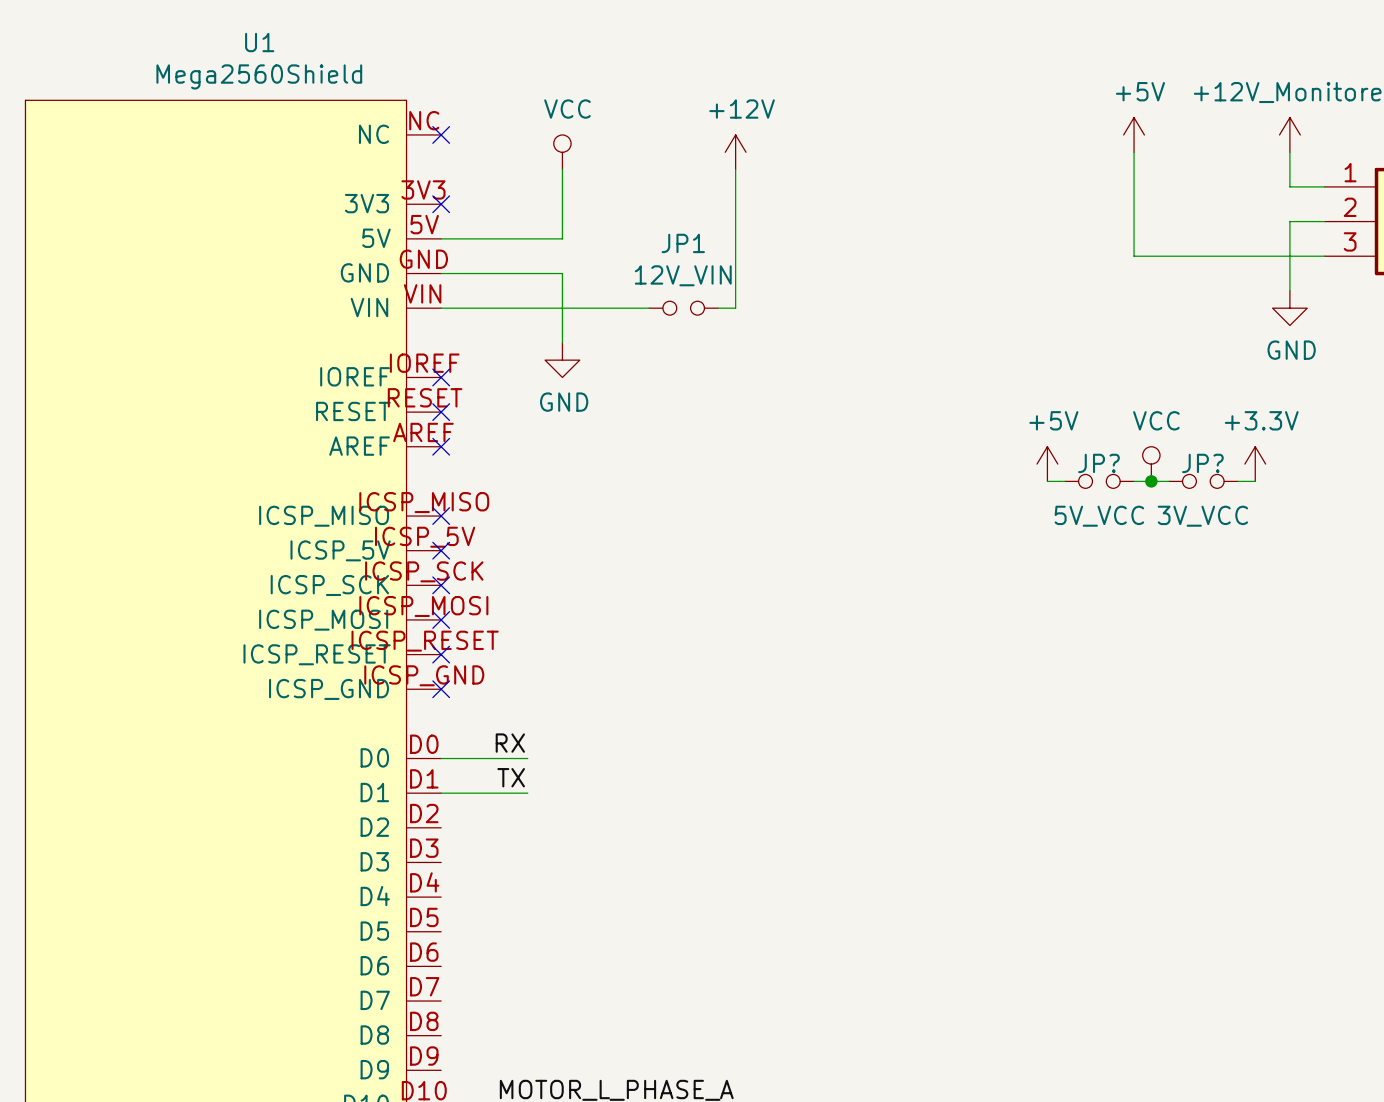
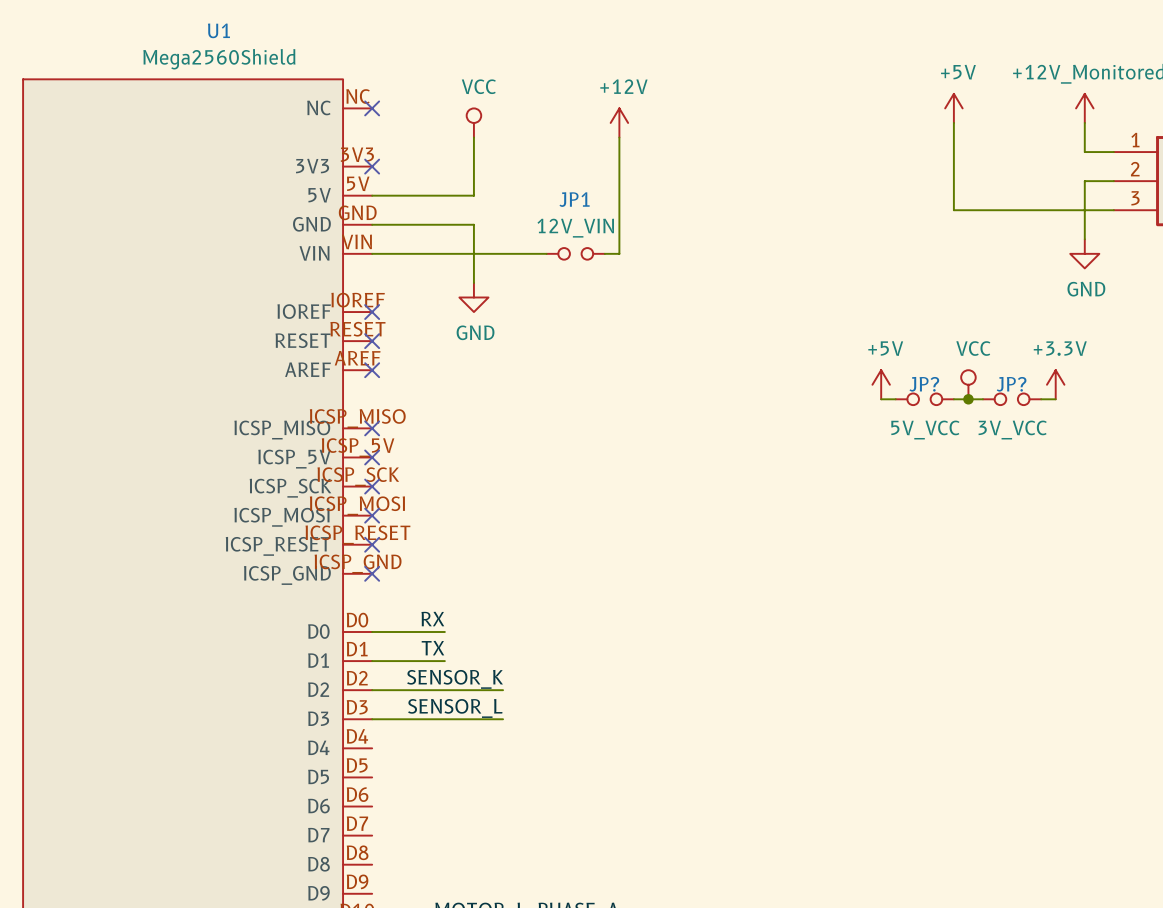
label: none -> SENSOR_K (455, 679)
wire: none -> (372, 690) (503, 690)
label: none -> SENSOR_L (455, 708)
wire: none -> (372, 719) (503, 719)

